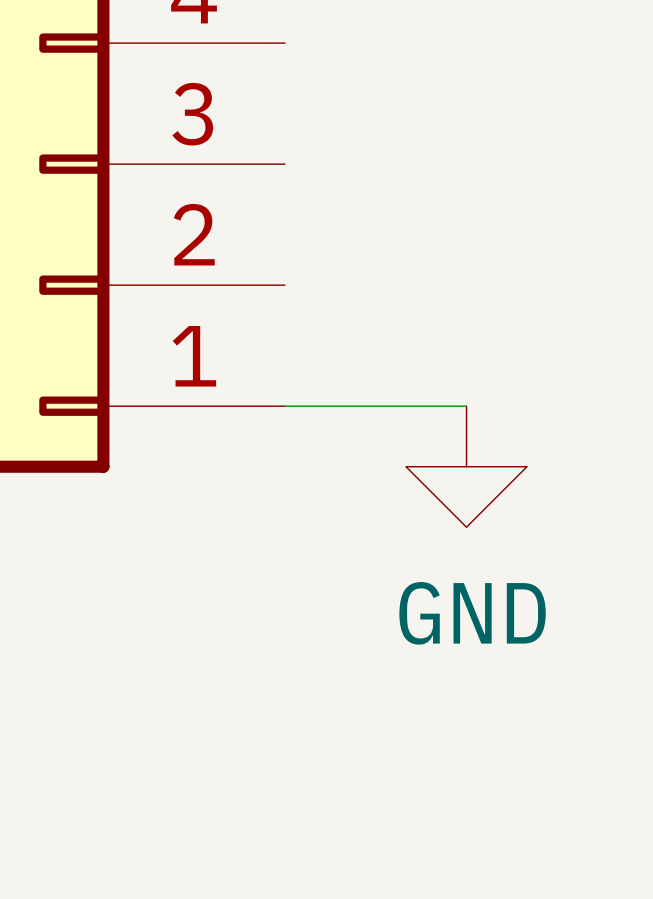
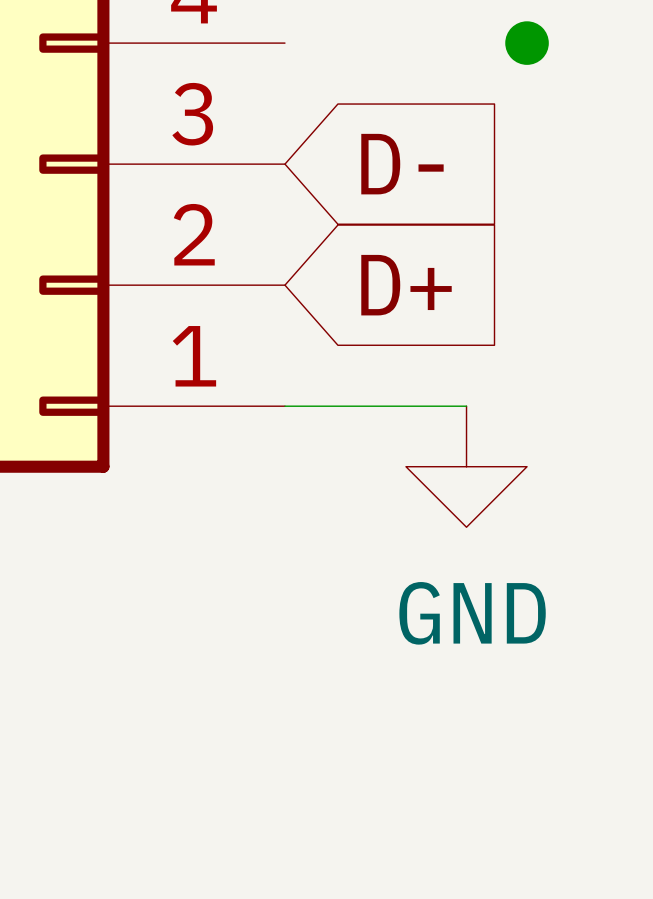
junction: none -> (527, 43)
global label: none -> D- (402, 164)
global label: none -> D+ (406, 285)

